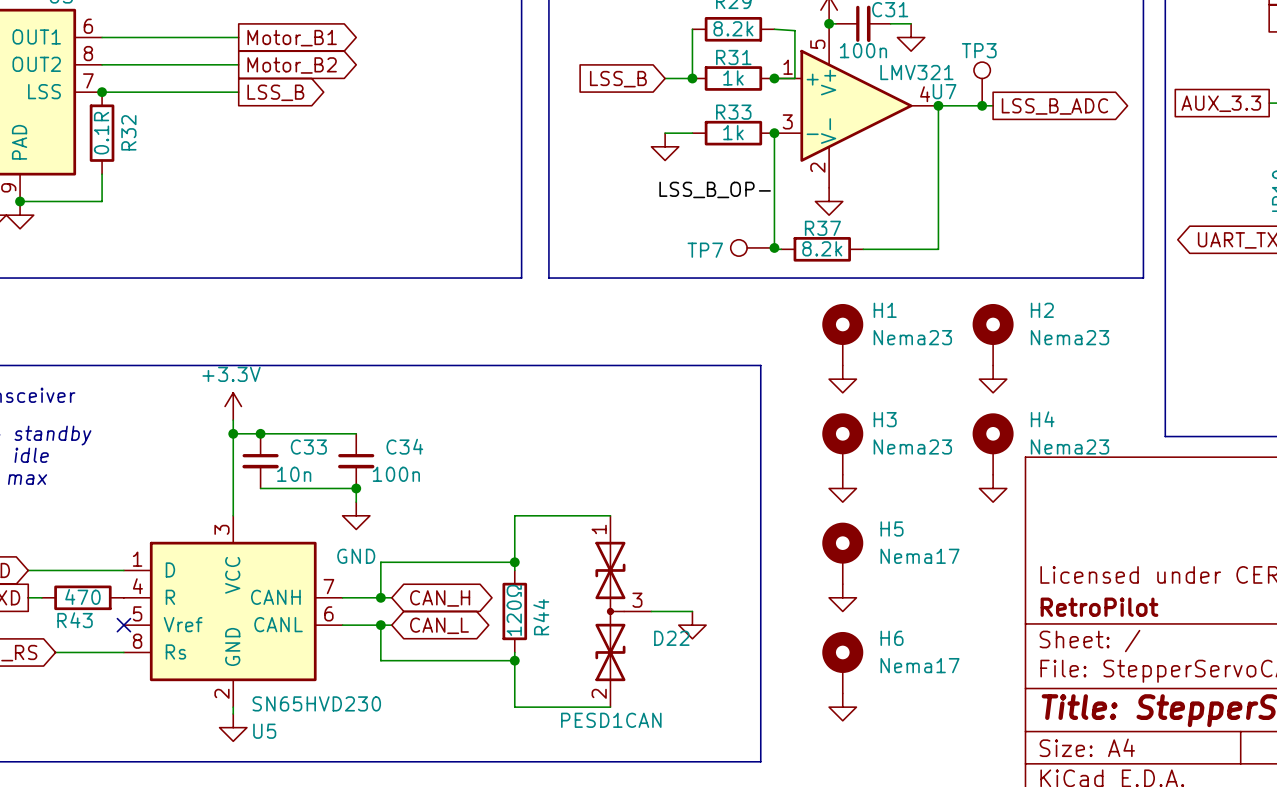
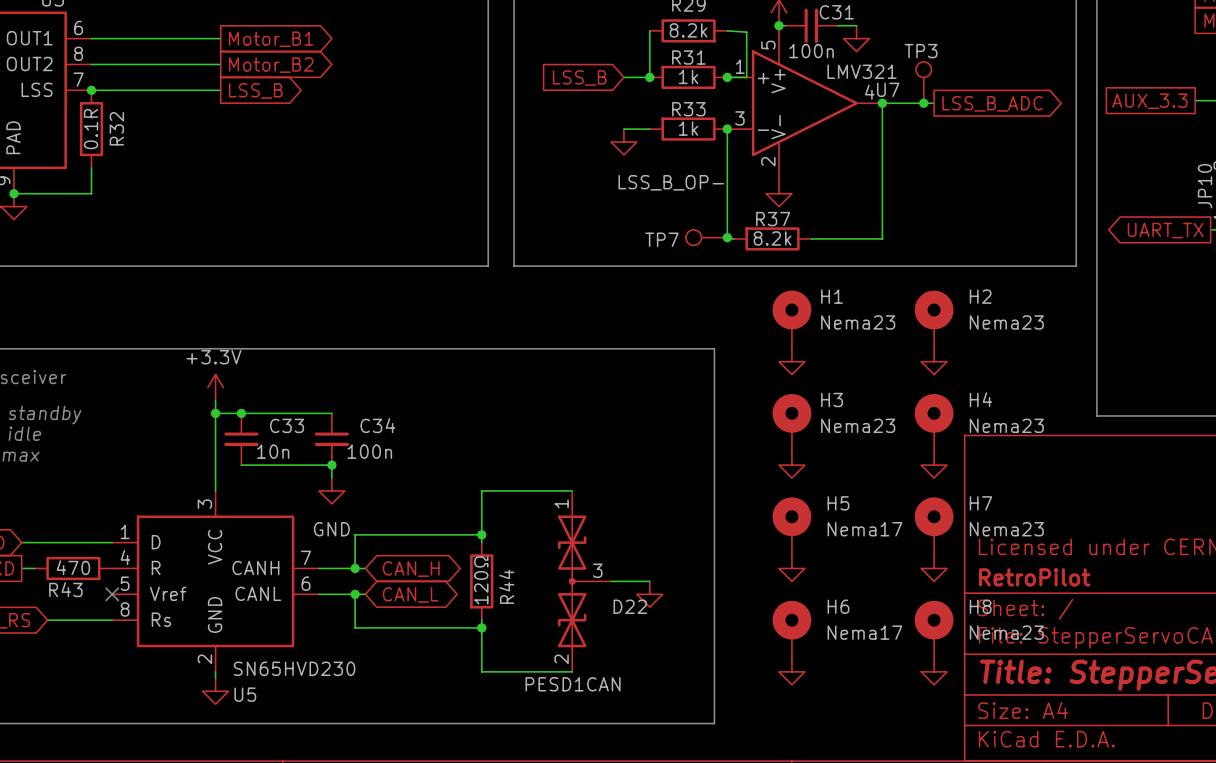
H7: none -> Nema23 (934, 526)
power symbol: none -> (934, 568)
H8: none -> Nema23 (934, 629)
power symbol: none -> (934, 671)

